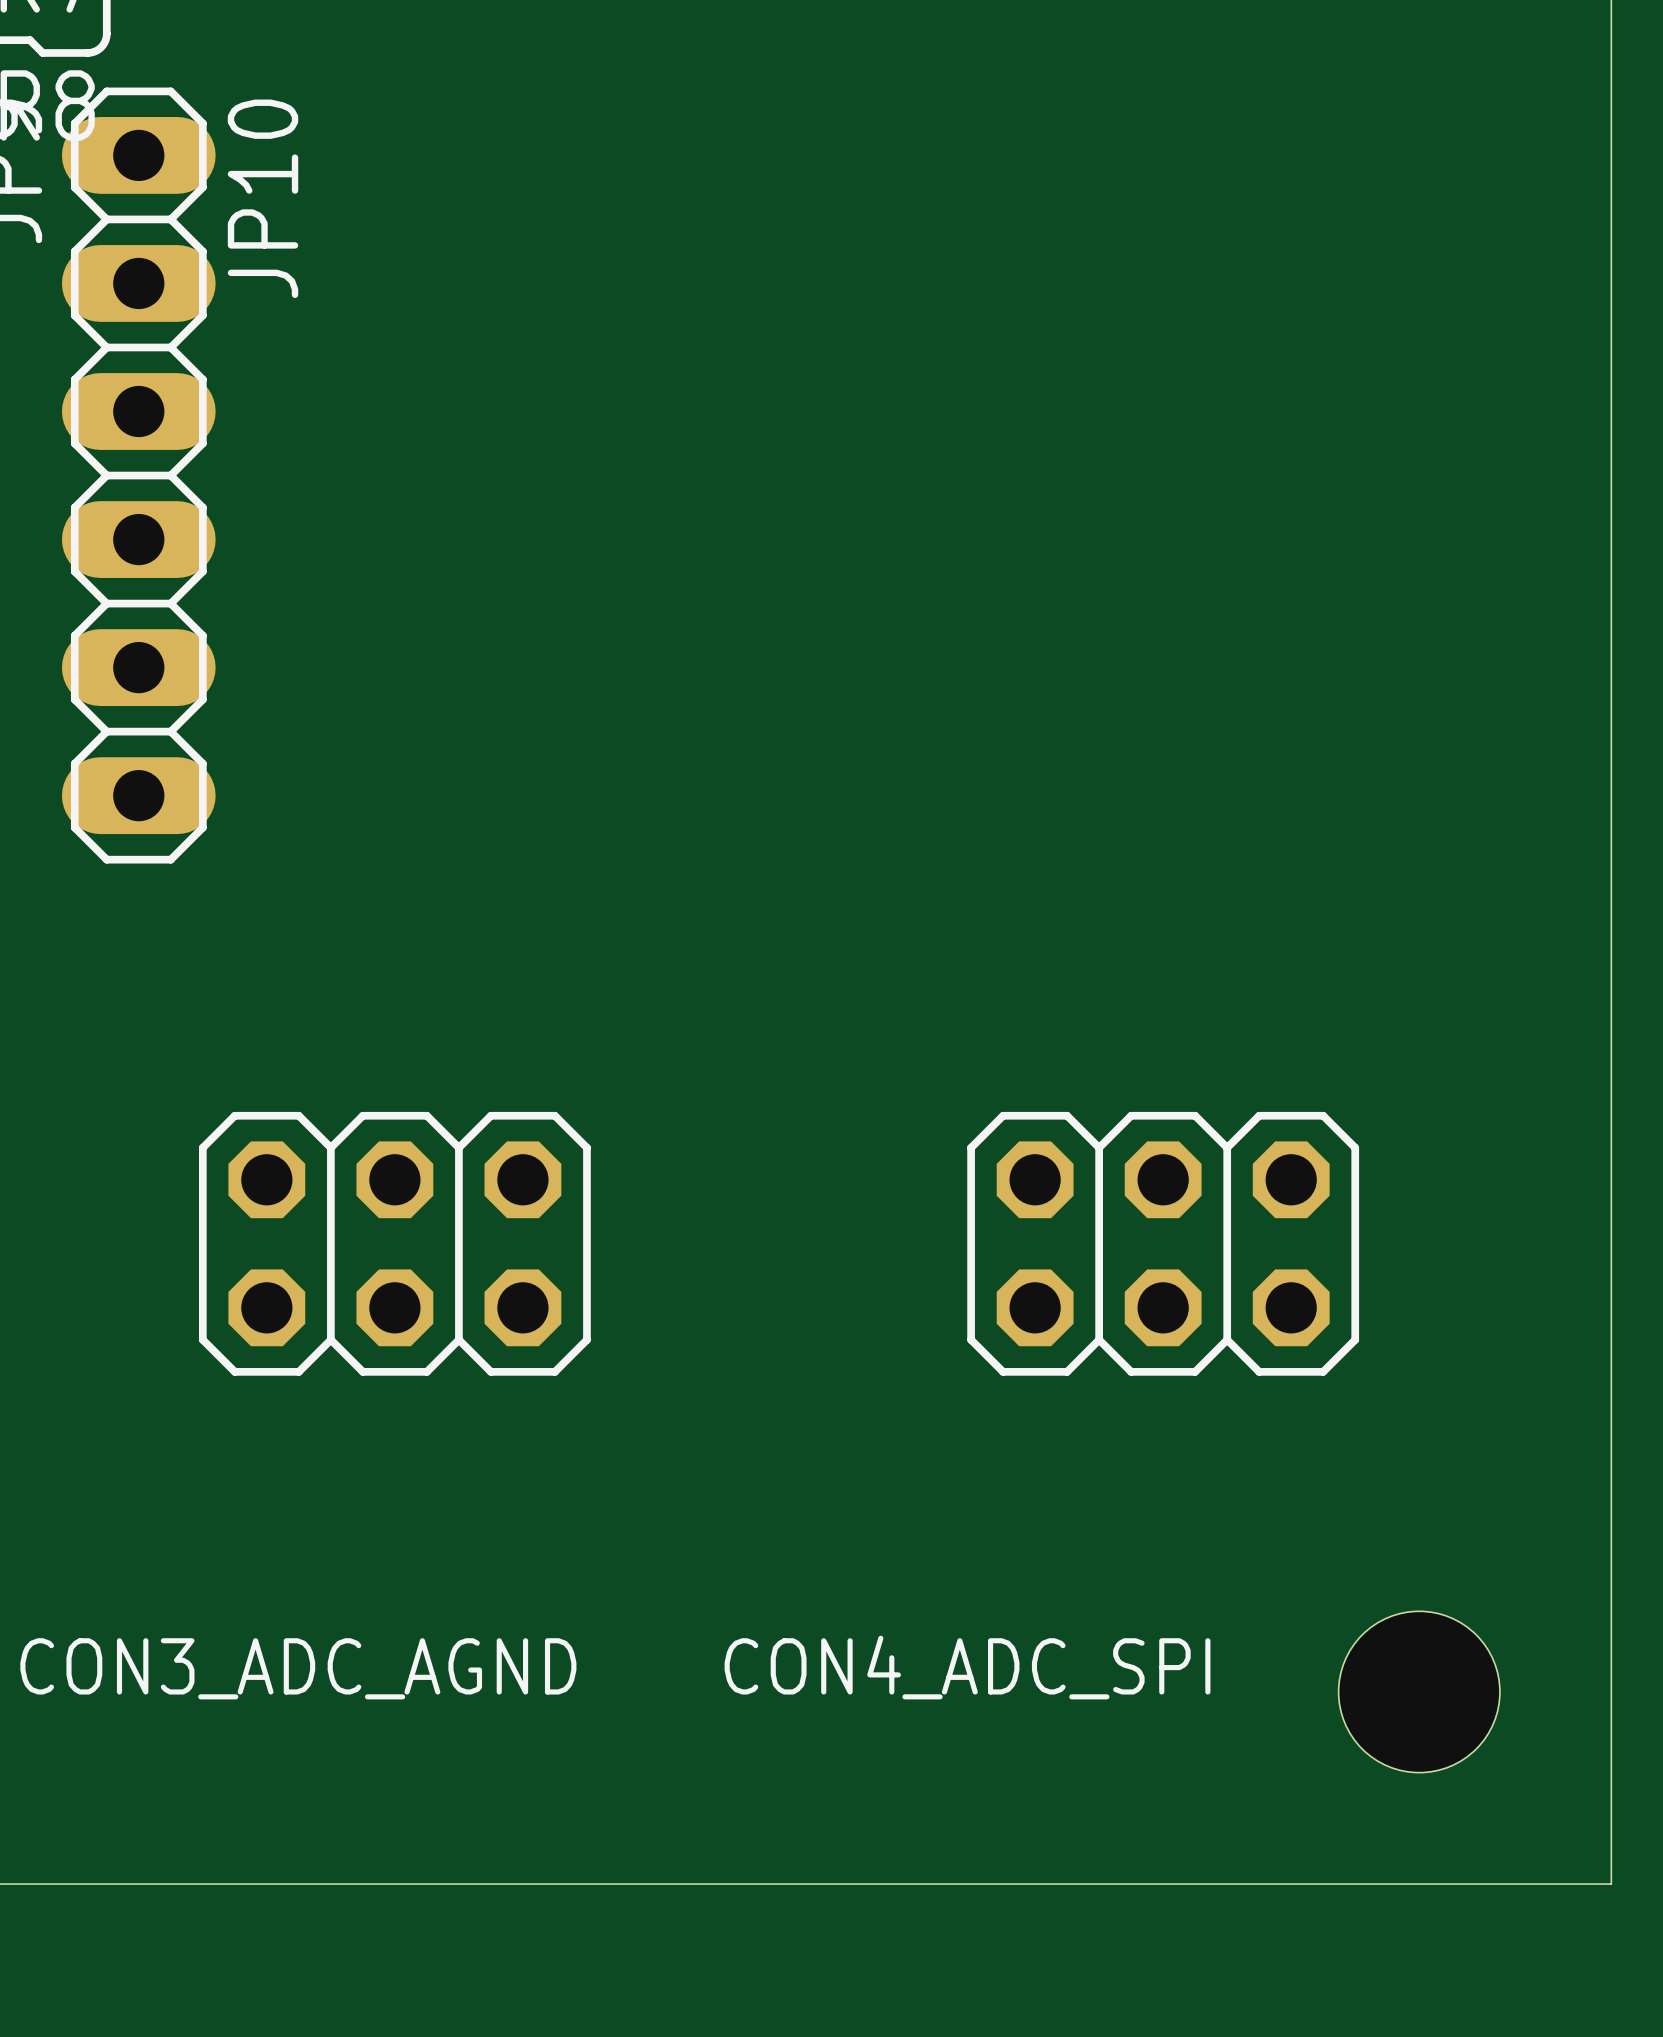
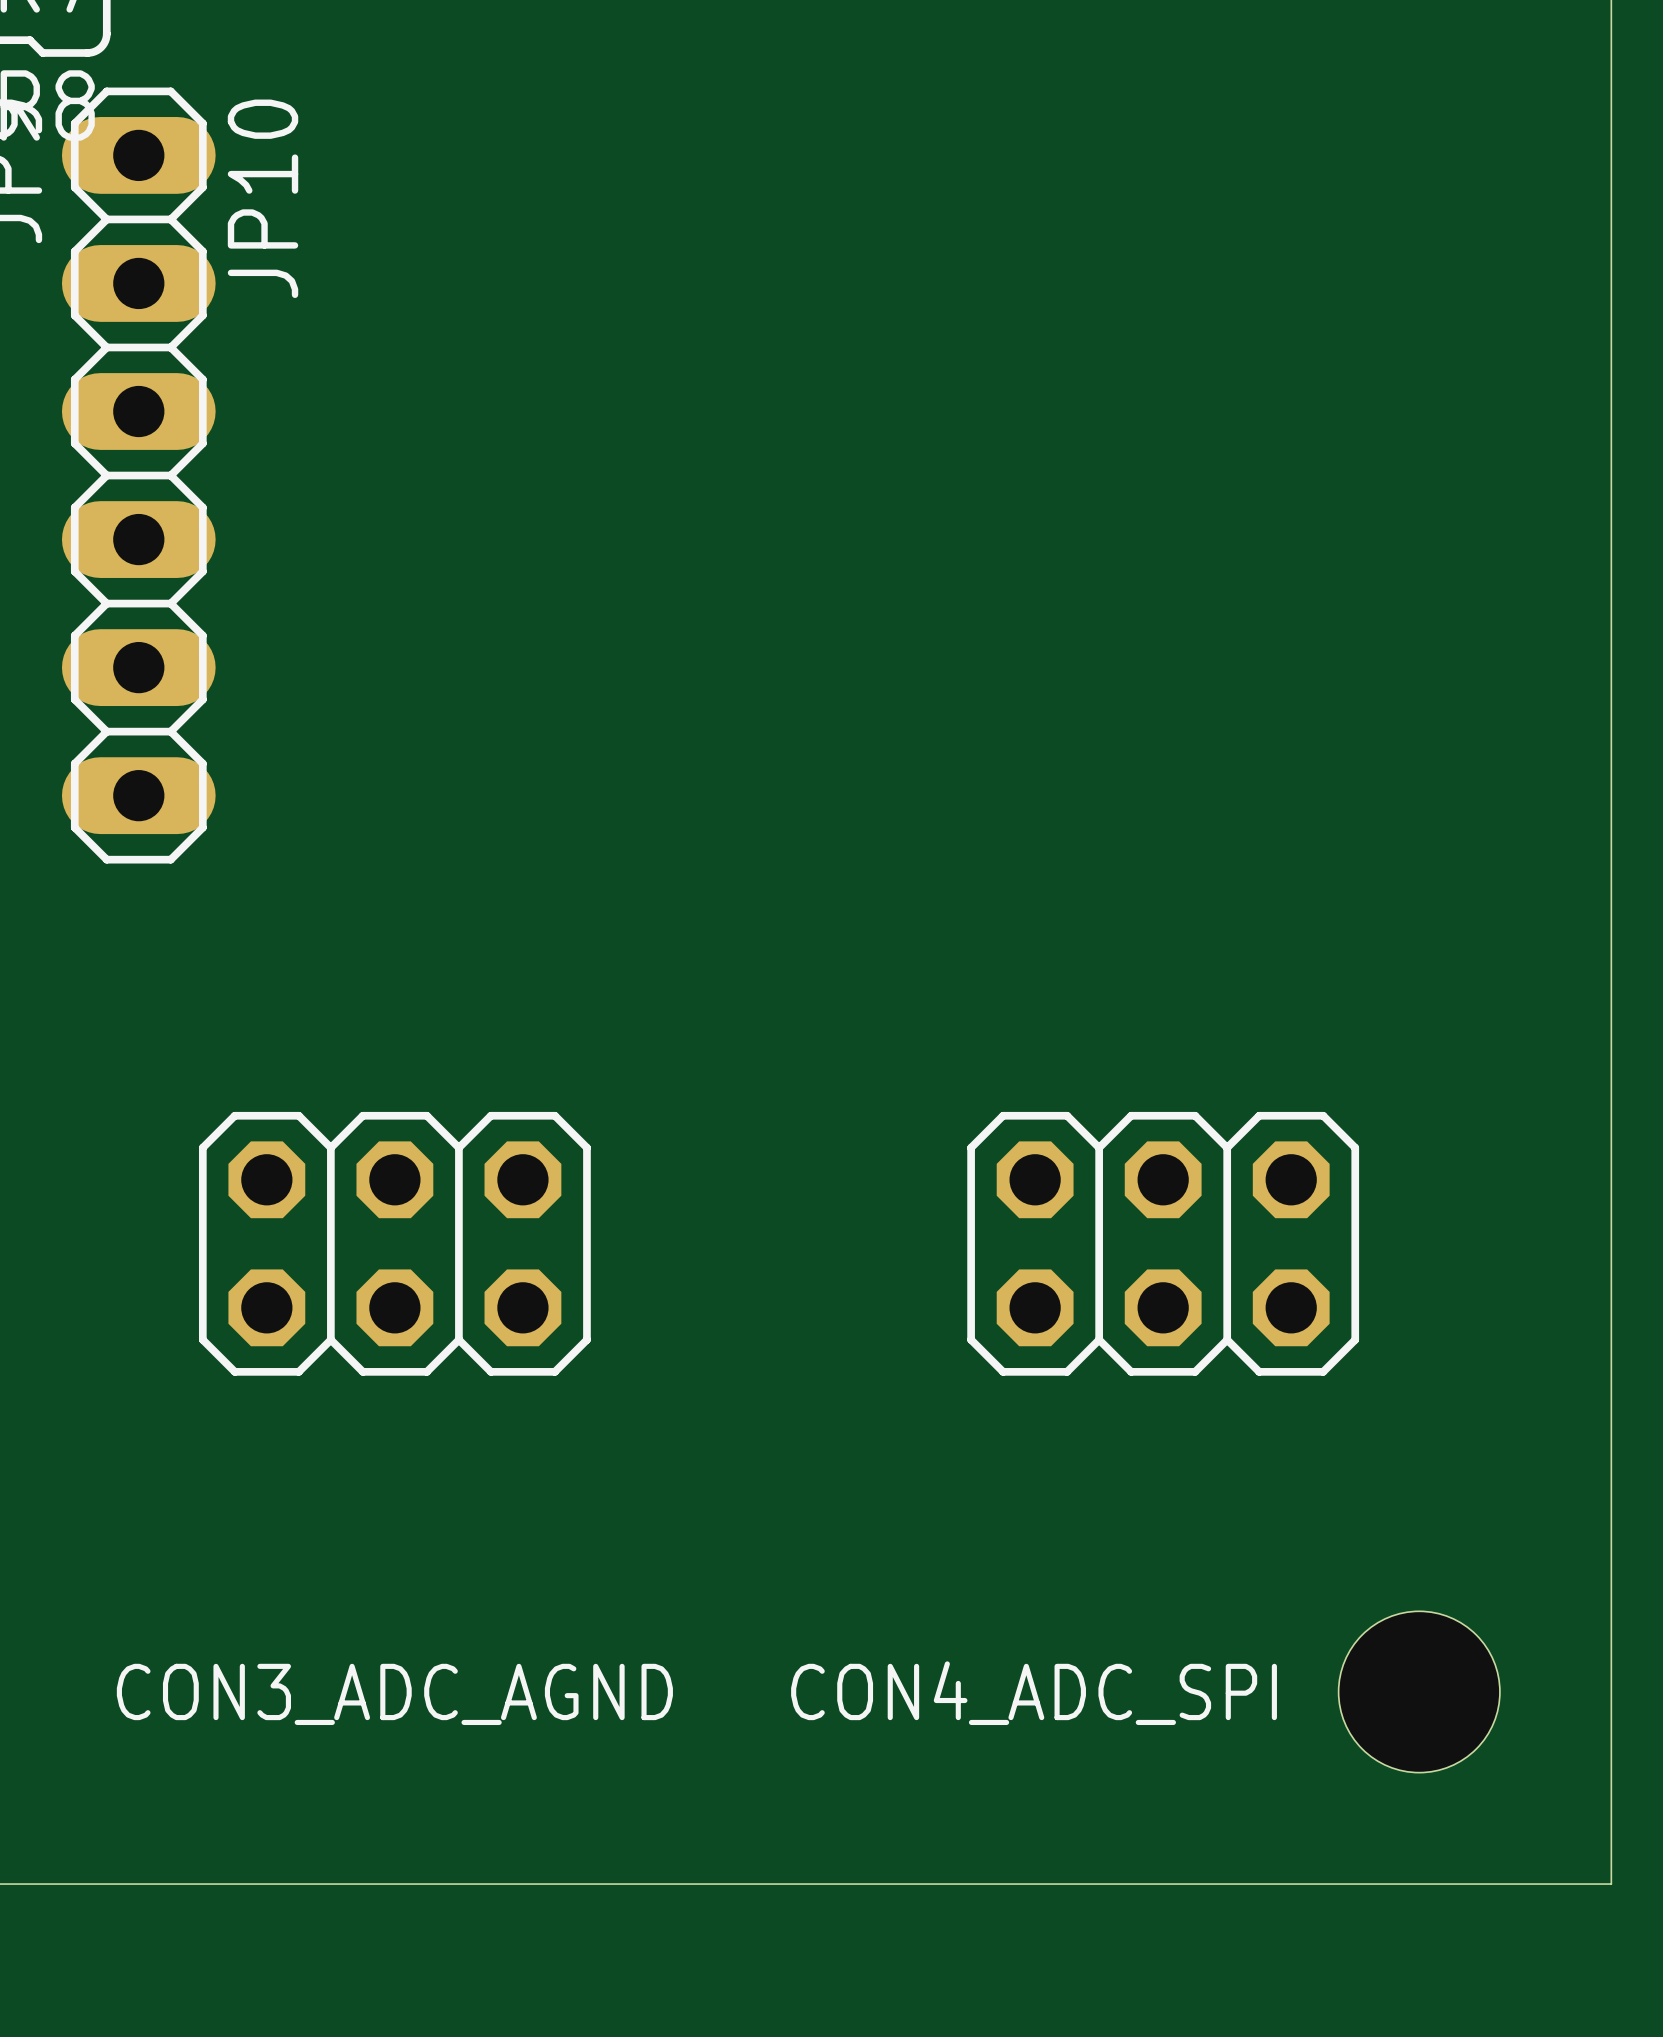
CON4_ADC_SPI name position: CON4_ADC_SPI (967, 1667) -> CON4_ADC_SPI (1034, 1693)
CON3_ADC_AGND name position: CON3_ADC_AGND (298, 1668) -> CON3_ADC_AGND (394, 1694)

